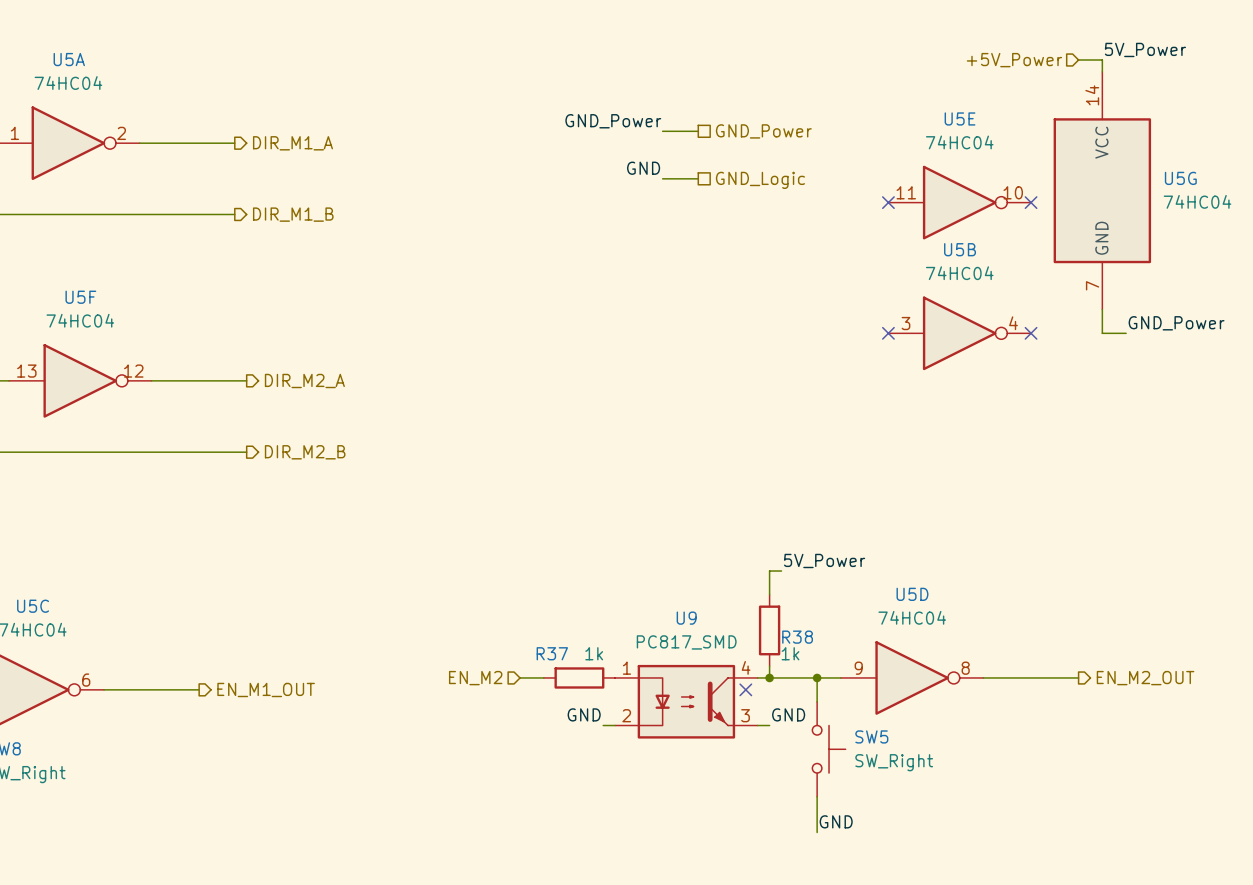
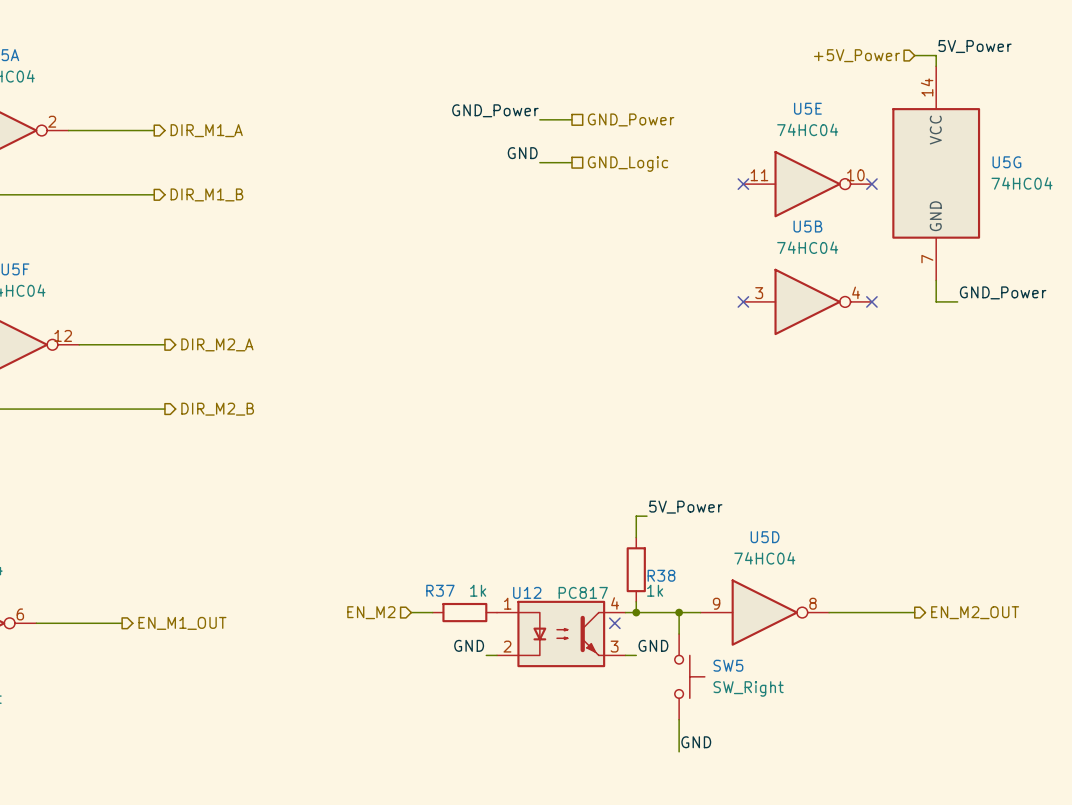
U9 name: U9 (686, 618) -> U12 (527, 592)
U9 value: PC817_SMD (686, 642) -> PC817 (583, 592)

